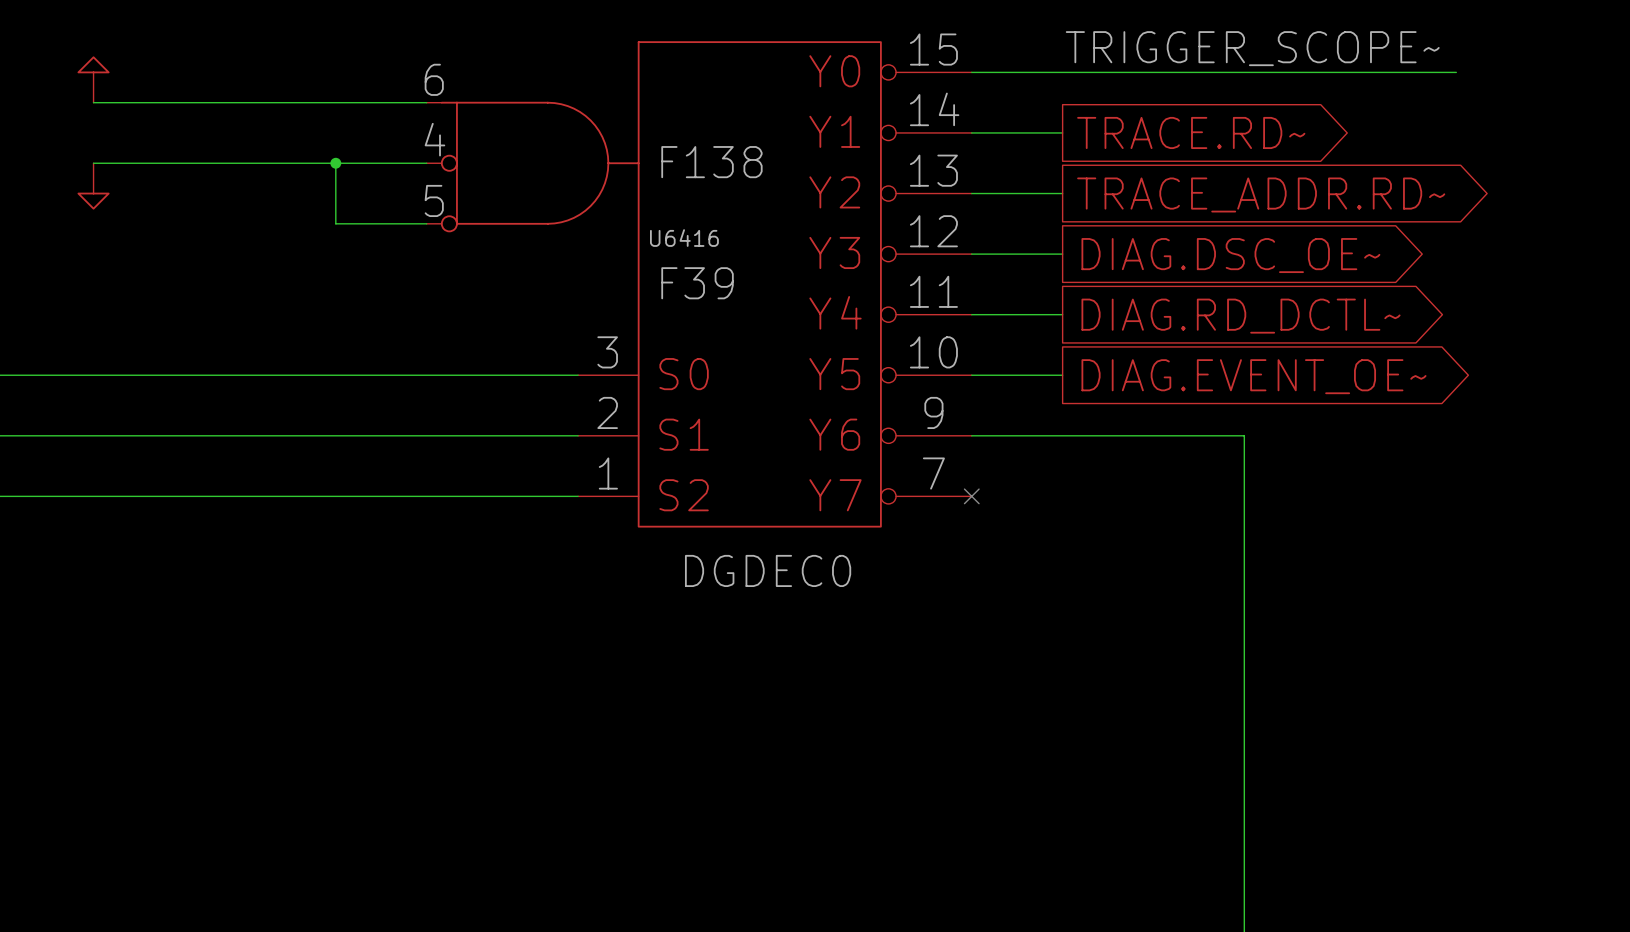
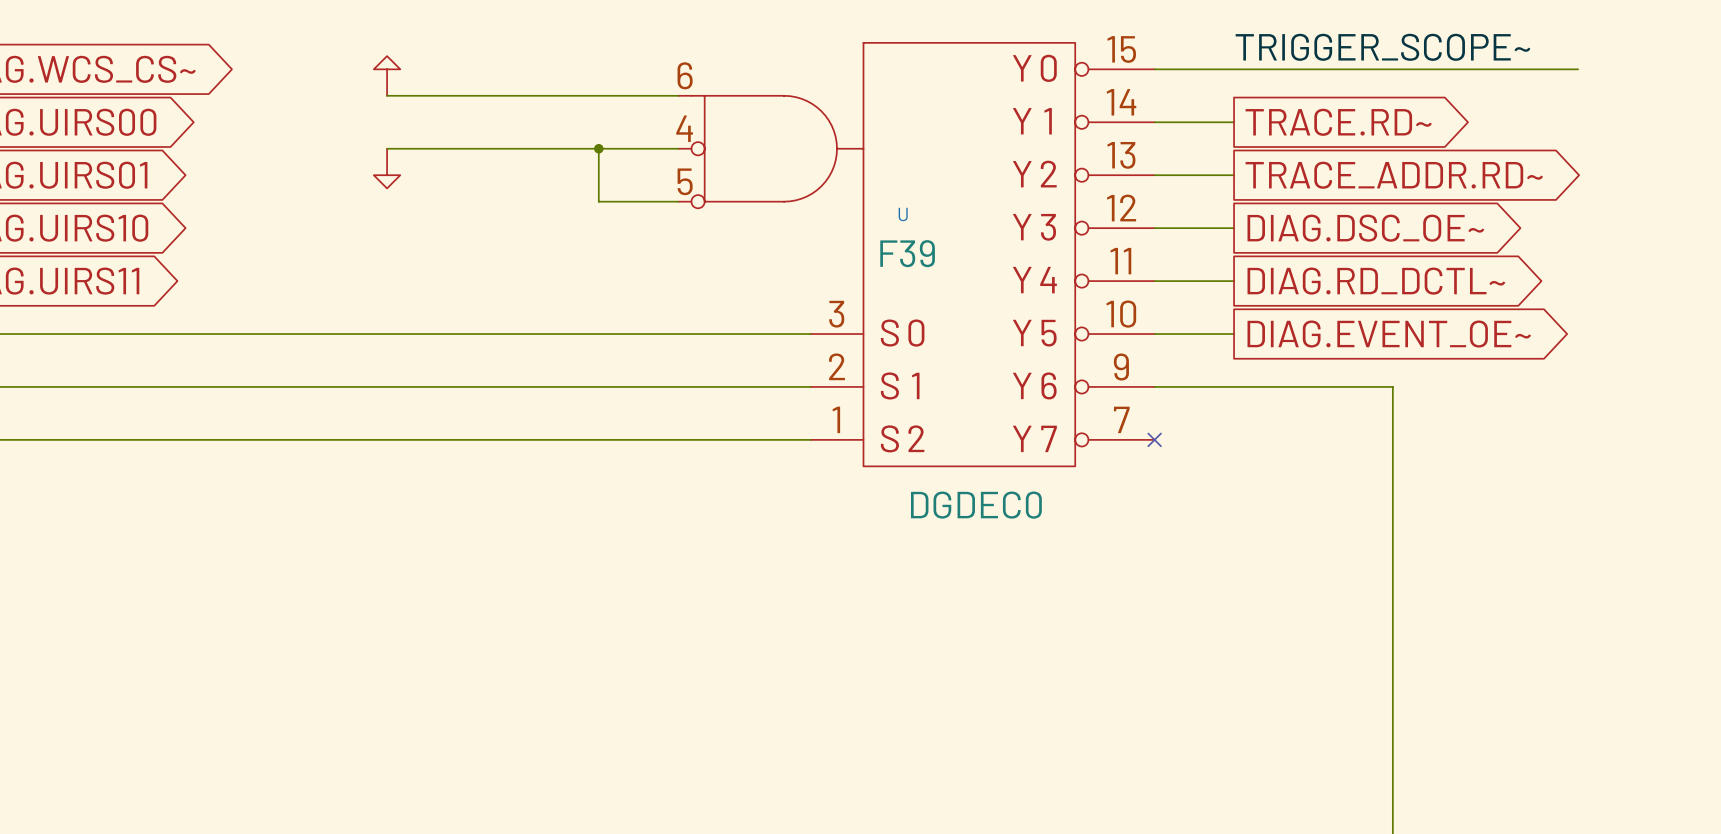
U6416 value: F138 (711, 162) -> none
U6416 name: U6416 (684, 238) -> U (903, 214)

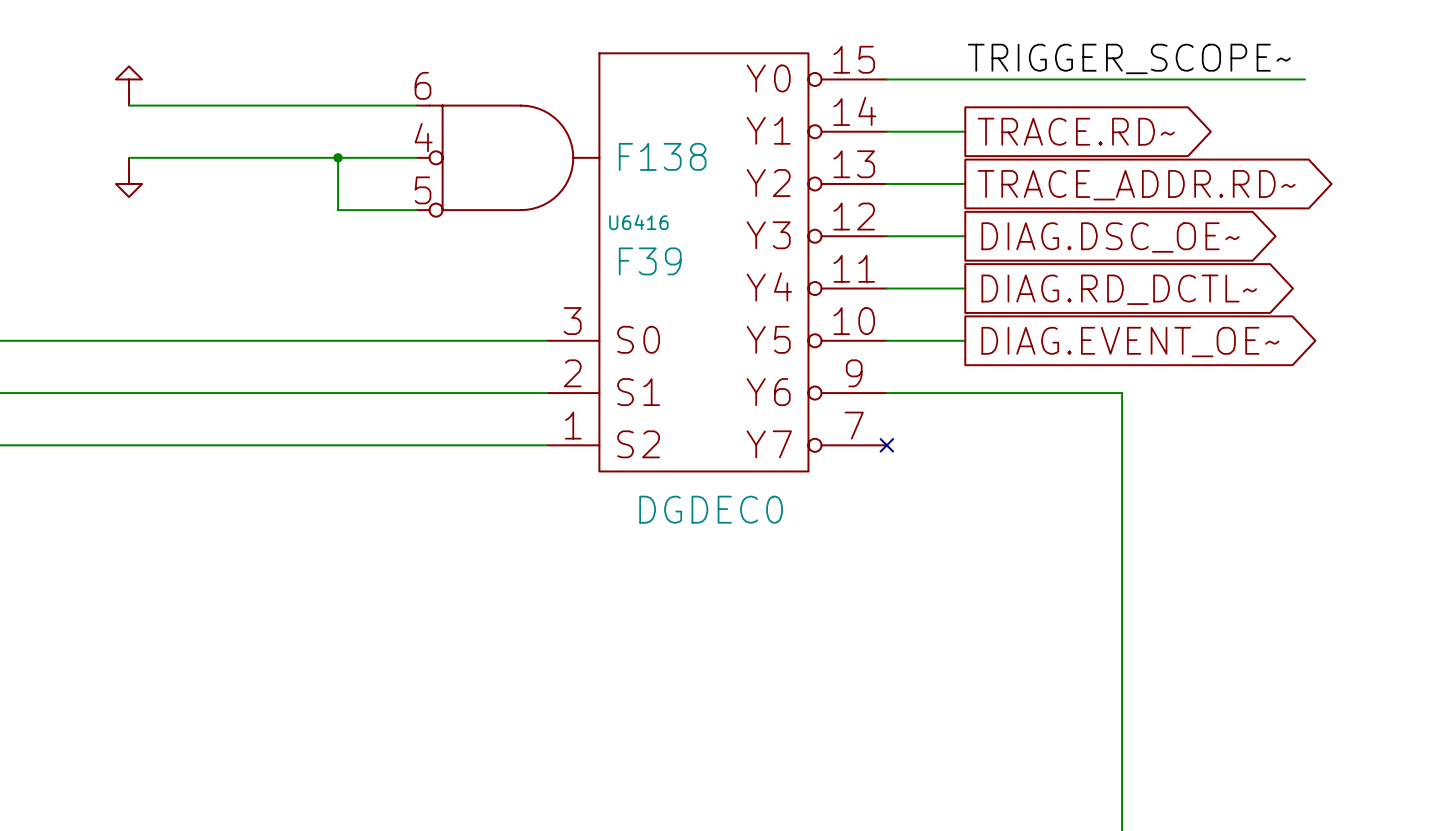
U value: none -> F138 (662, 156)
U name: U (903, 214) -> U6416 (638, 222)

